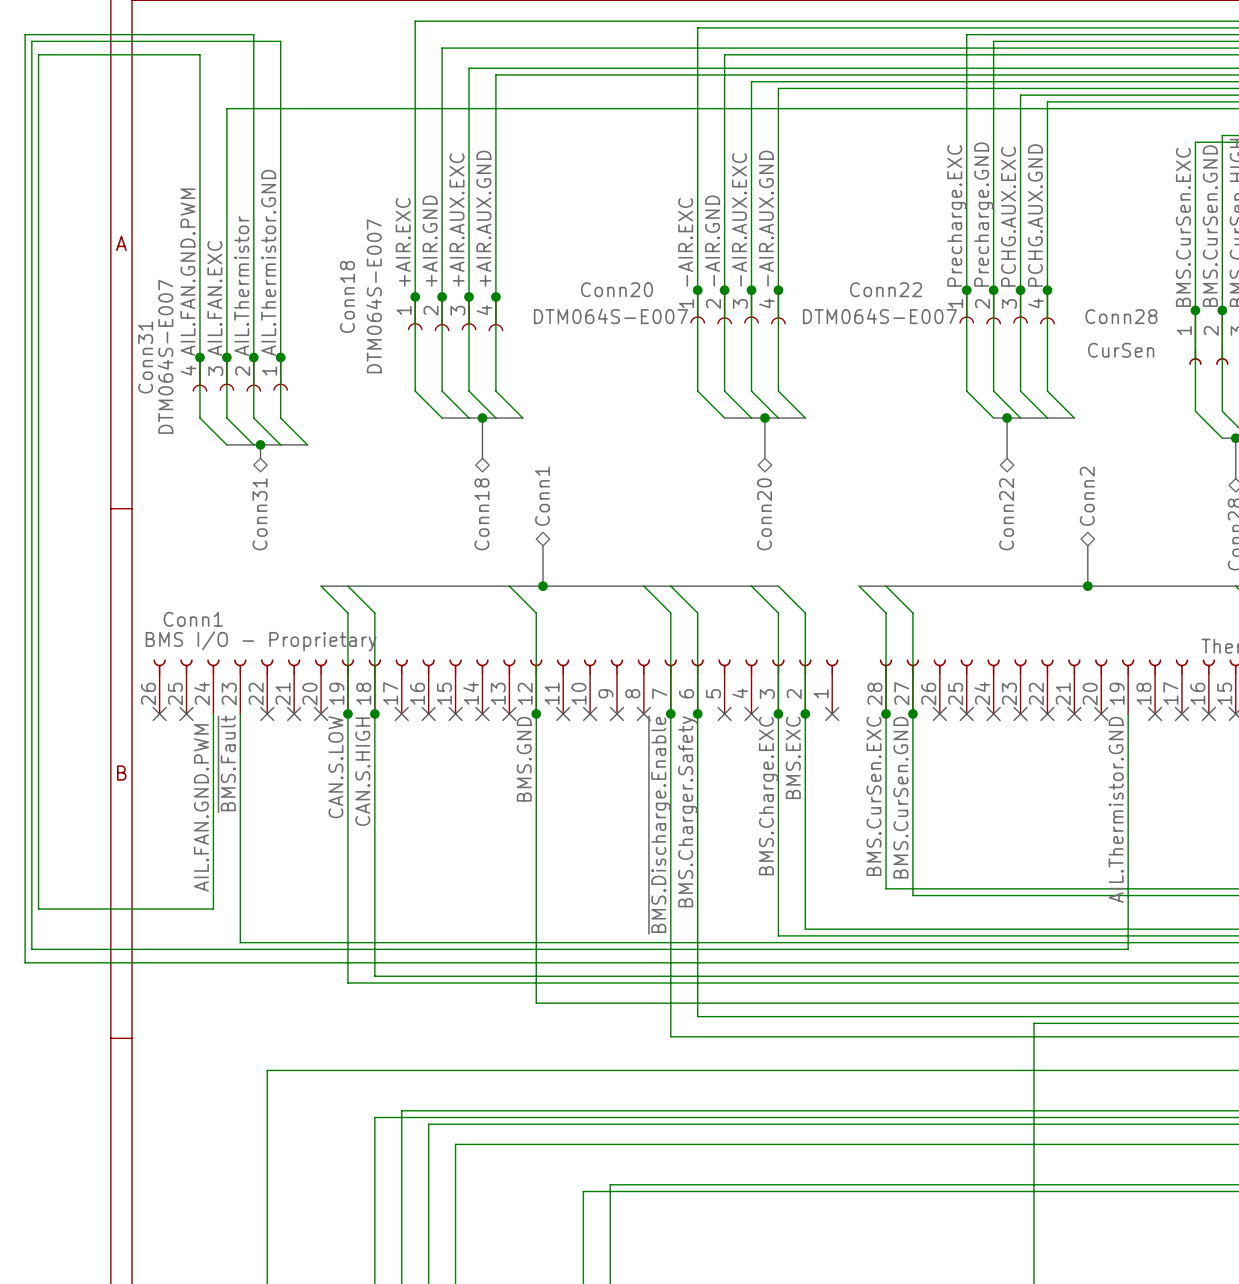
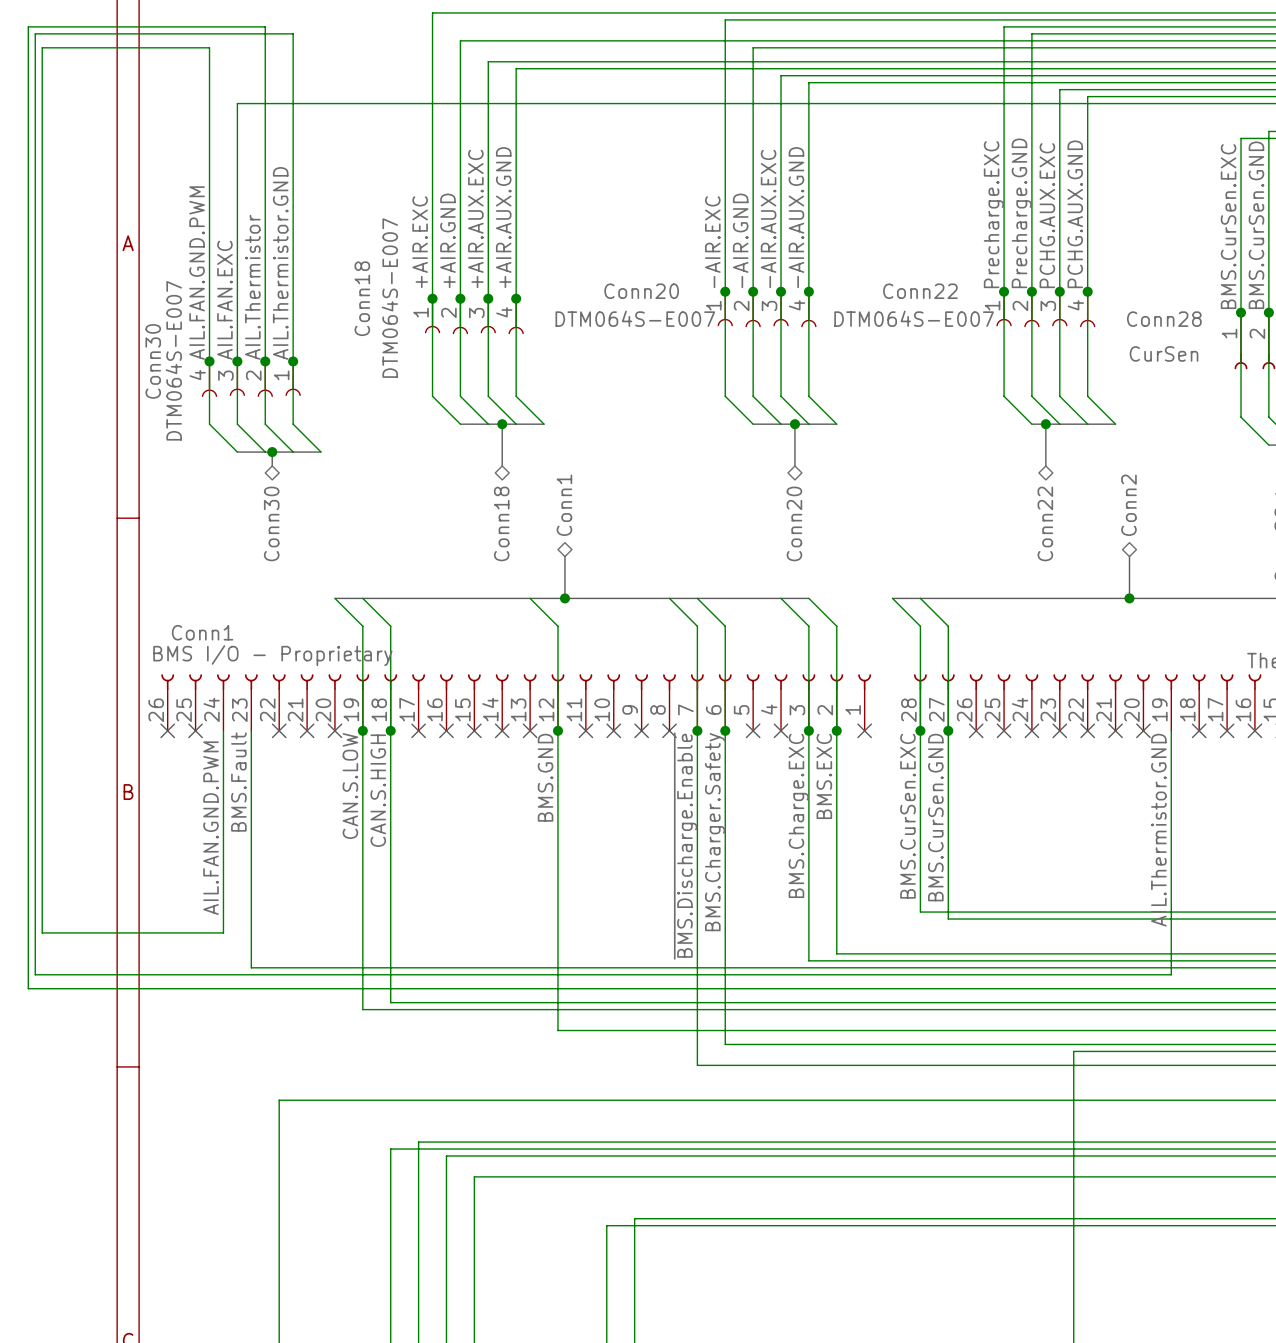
Conn31 name: Conn31 (145, 357) -> Conn30 (153, 361)
hierarchical label: Conn31 (260, 514) -> Conn30 (271, 523)
label: ~{BMS.Fault} (226, 764) -> BMS.Fault (238, 782)

